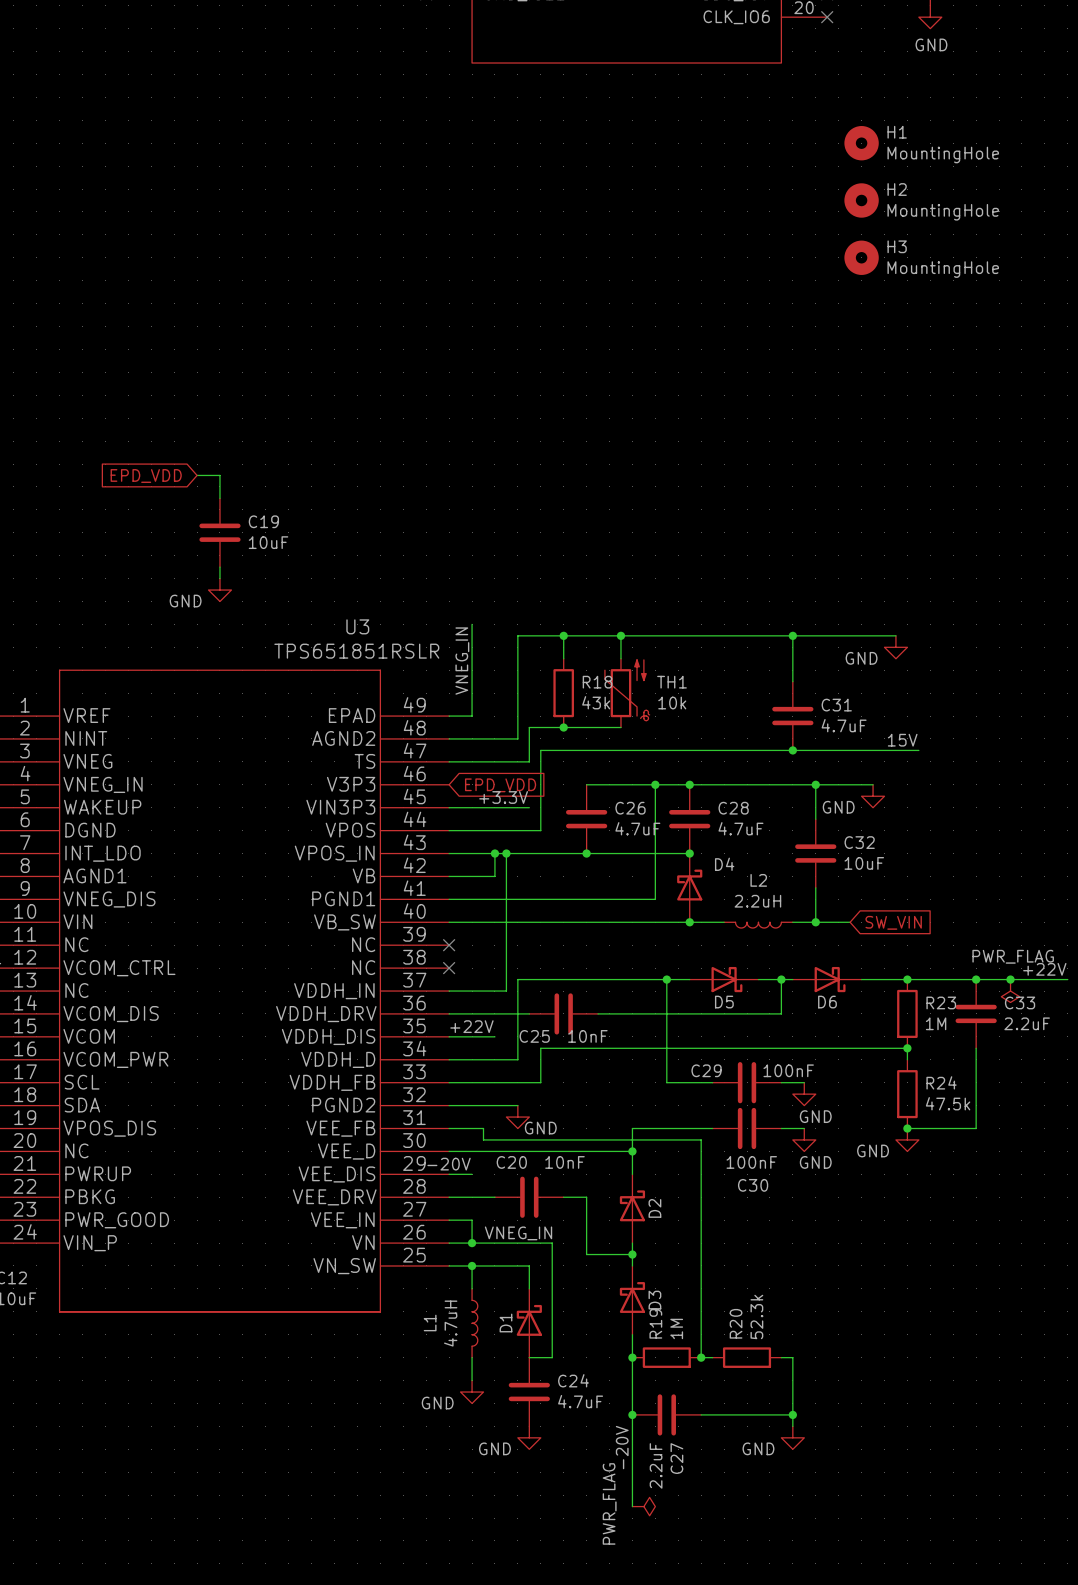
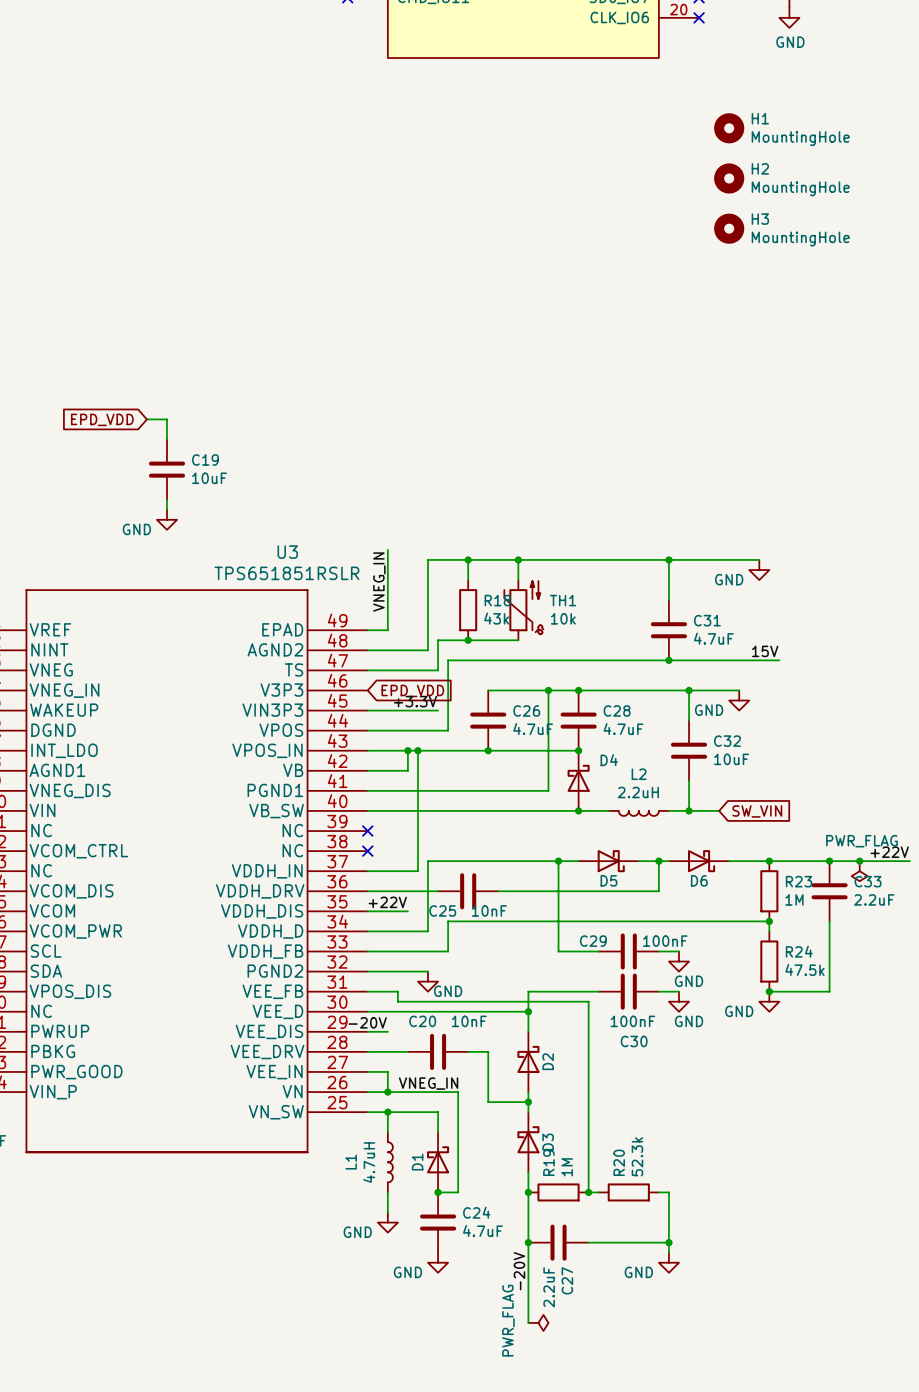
junction: none -> (438, 1192)

